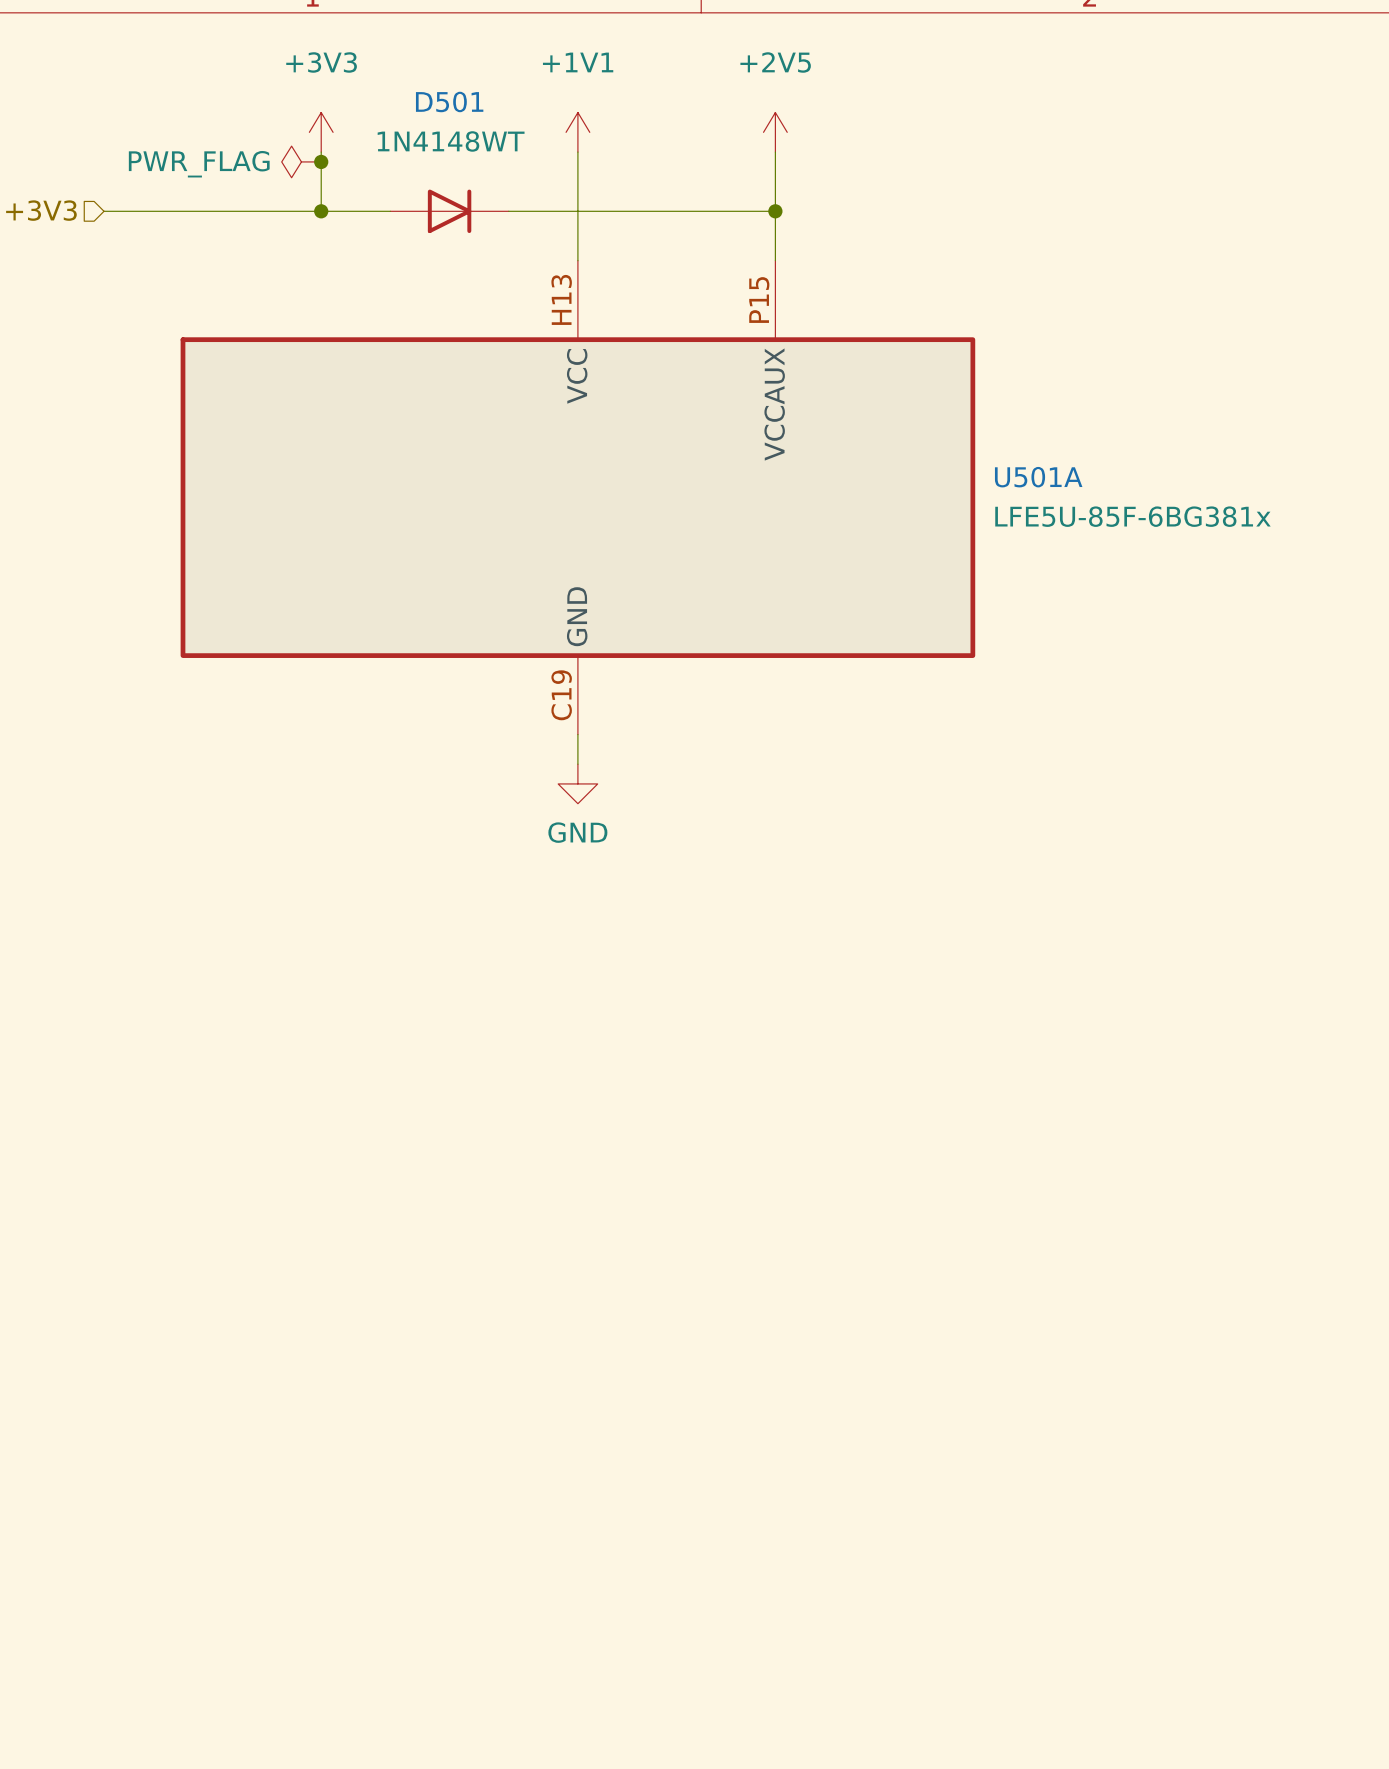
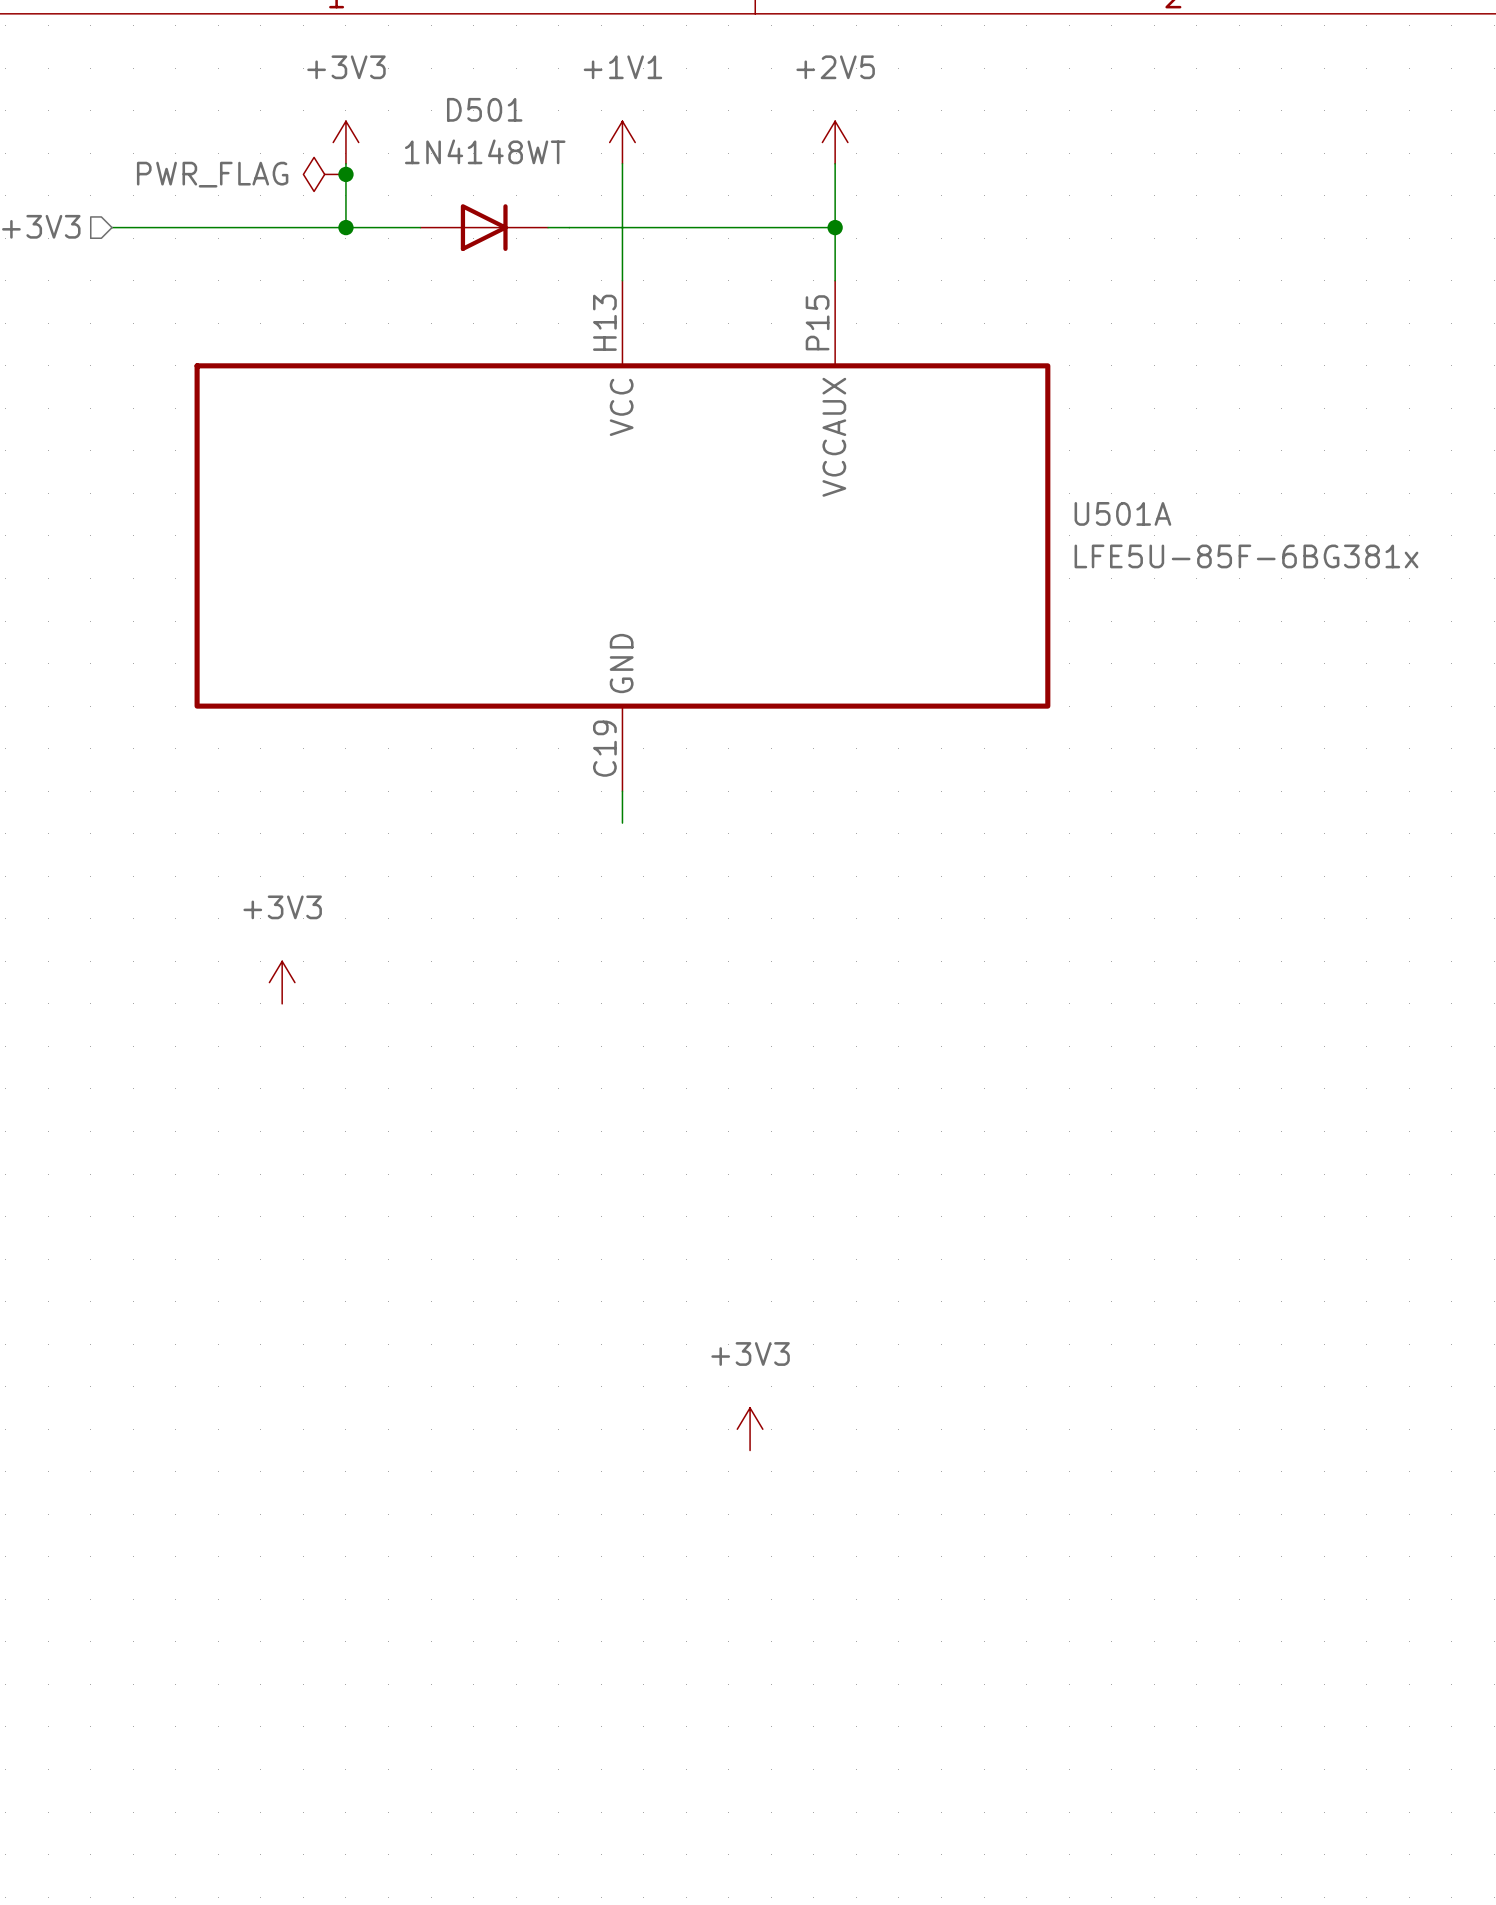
power symbol: GND (577, 783) -> none
power symbol: none -> +3V3 (282, 982)
power symbol: none -> +3V3 (750, 1429)

